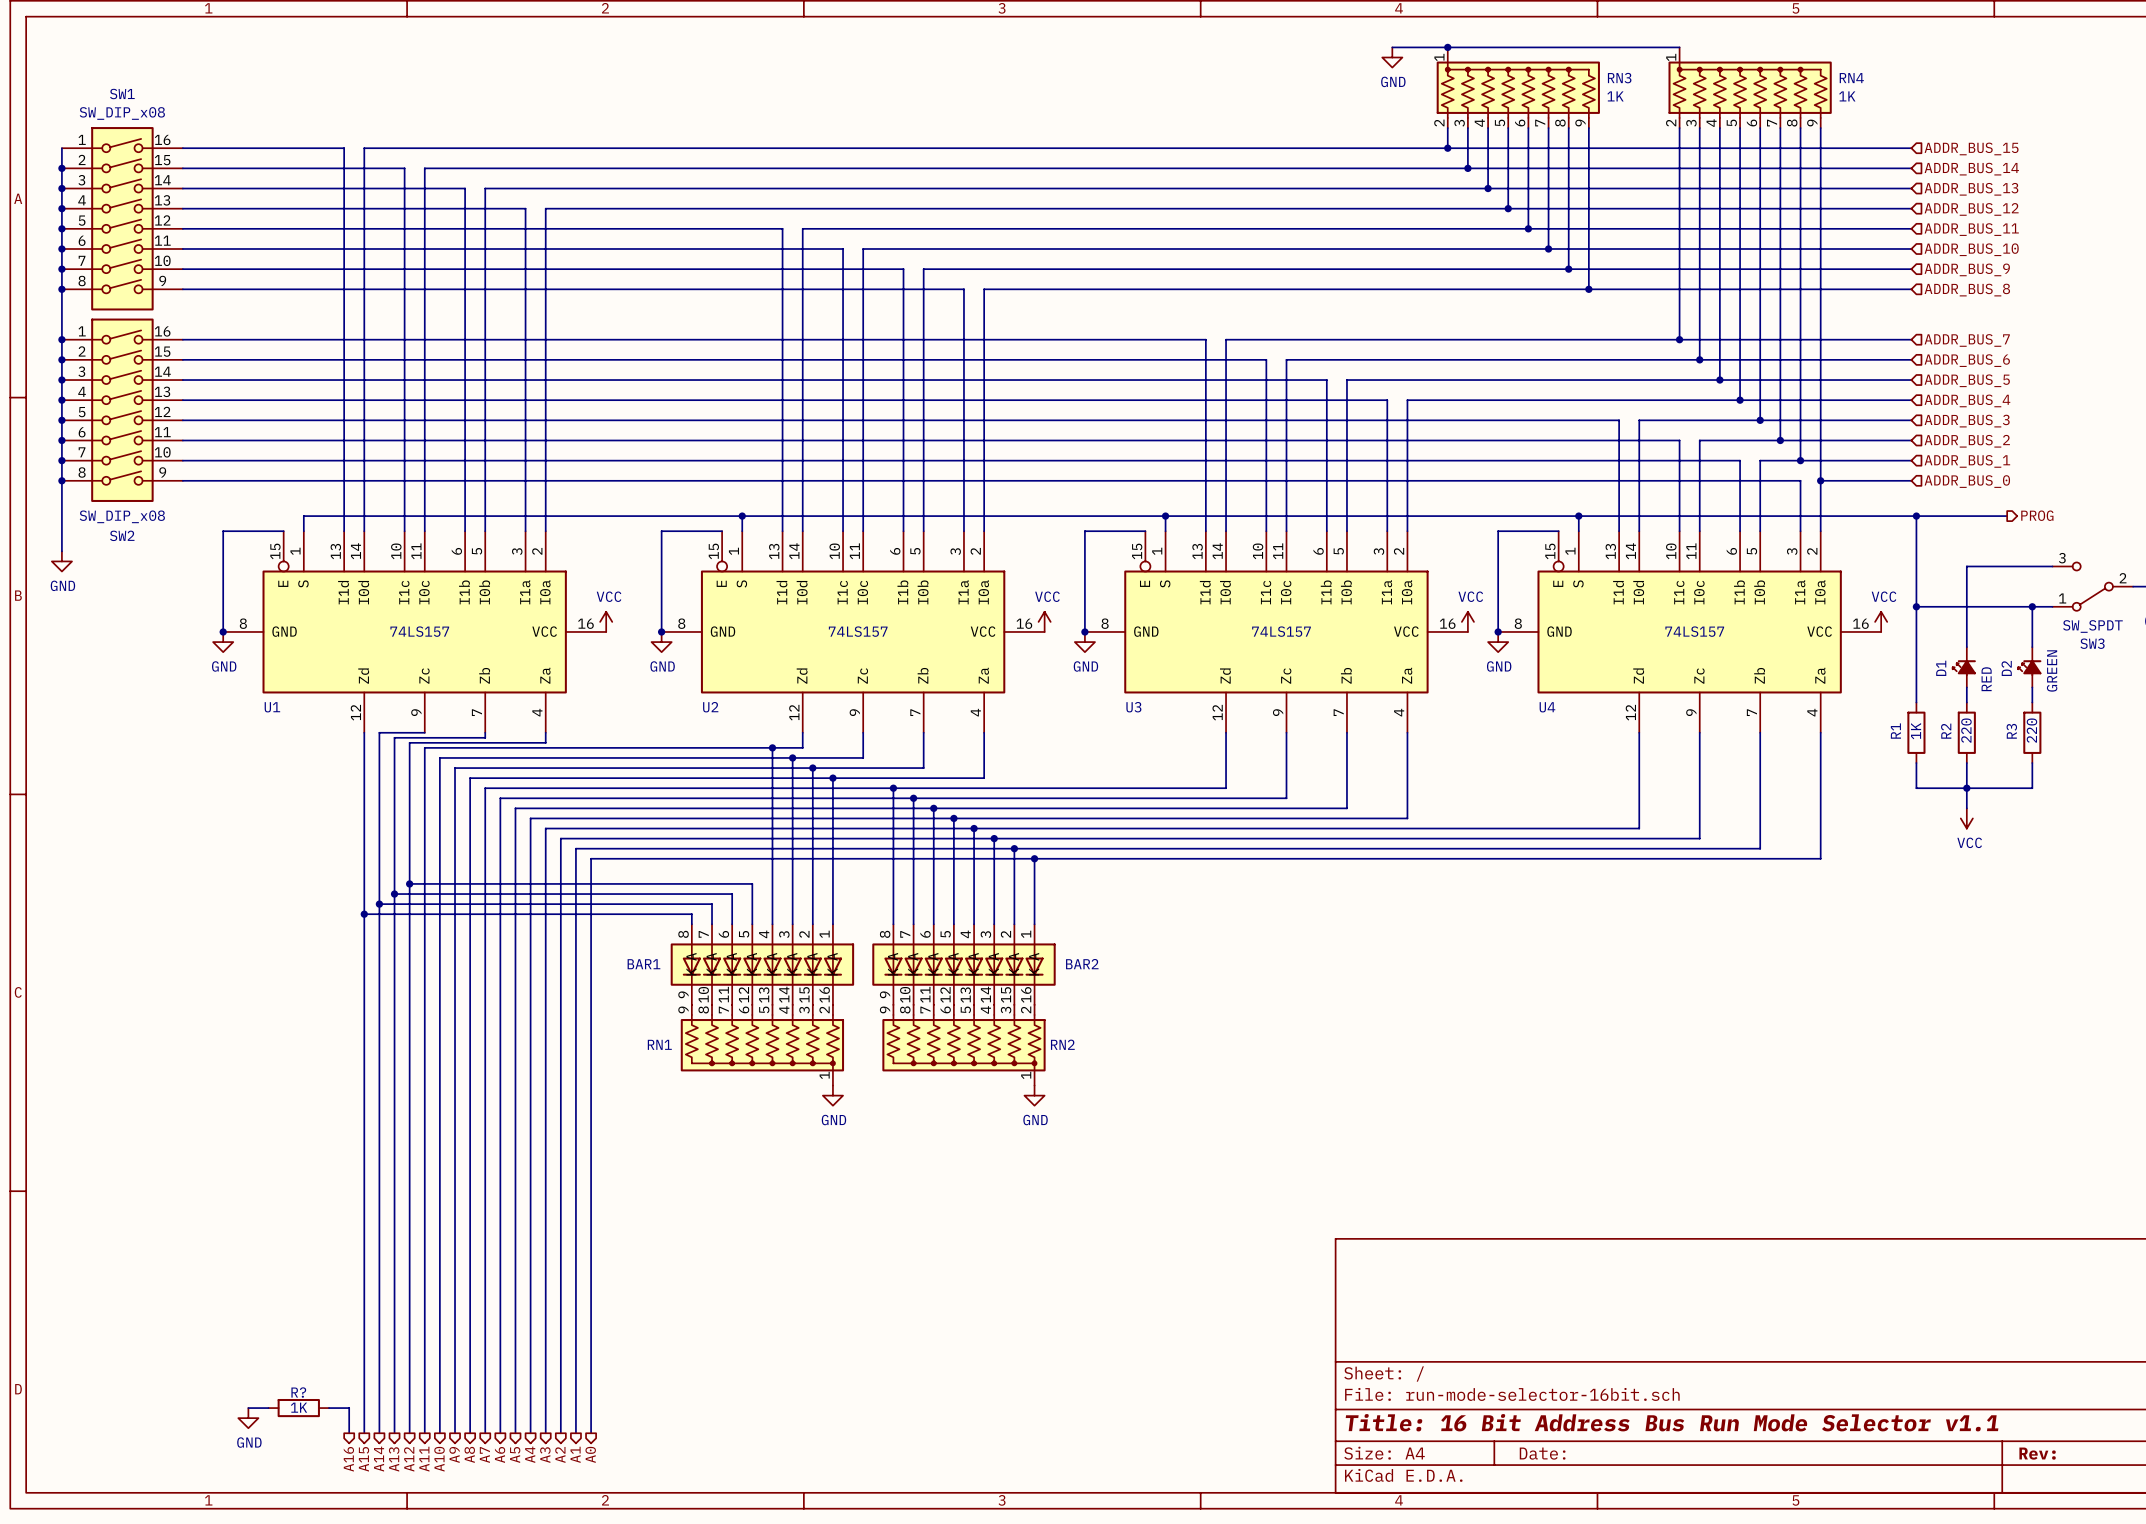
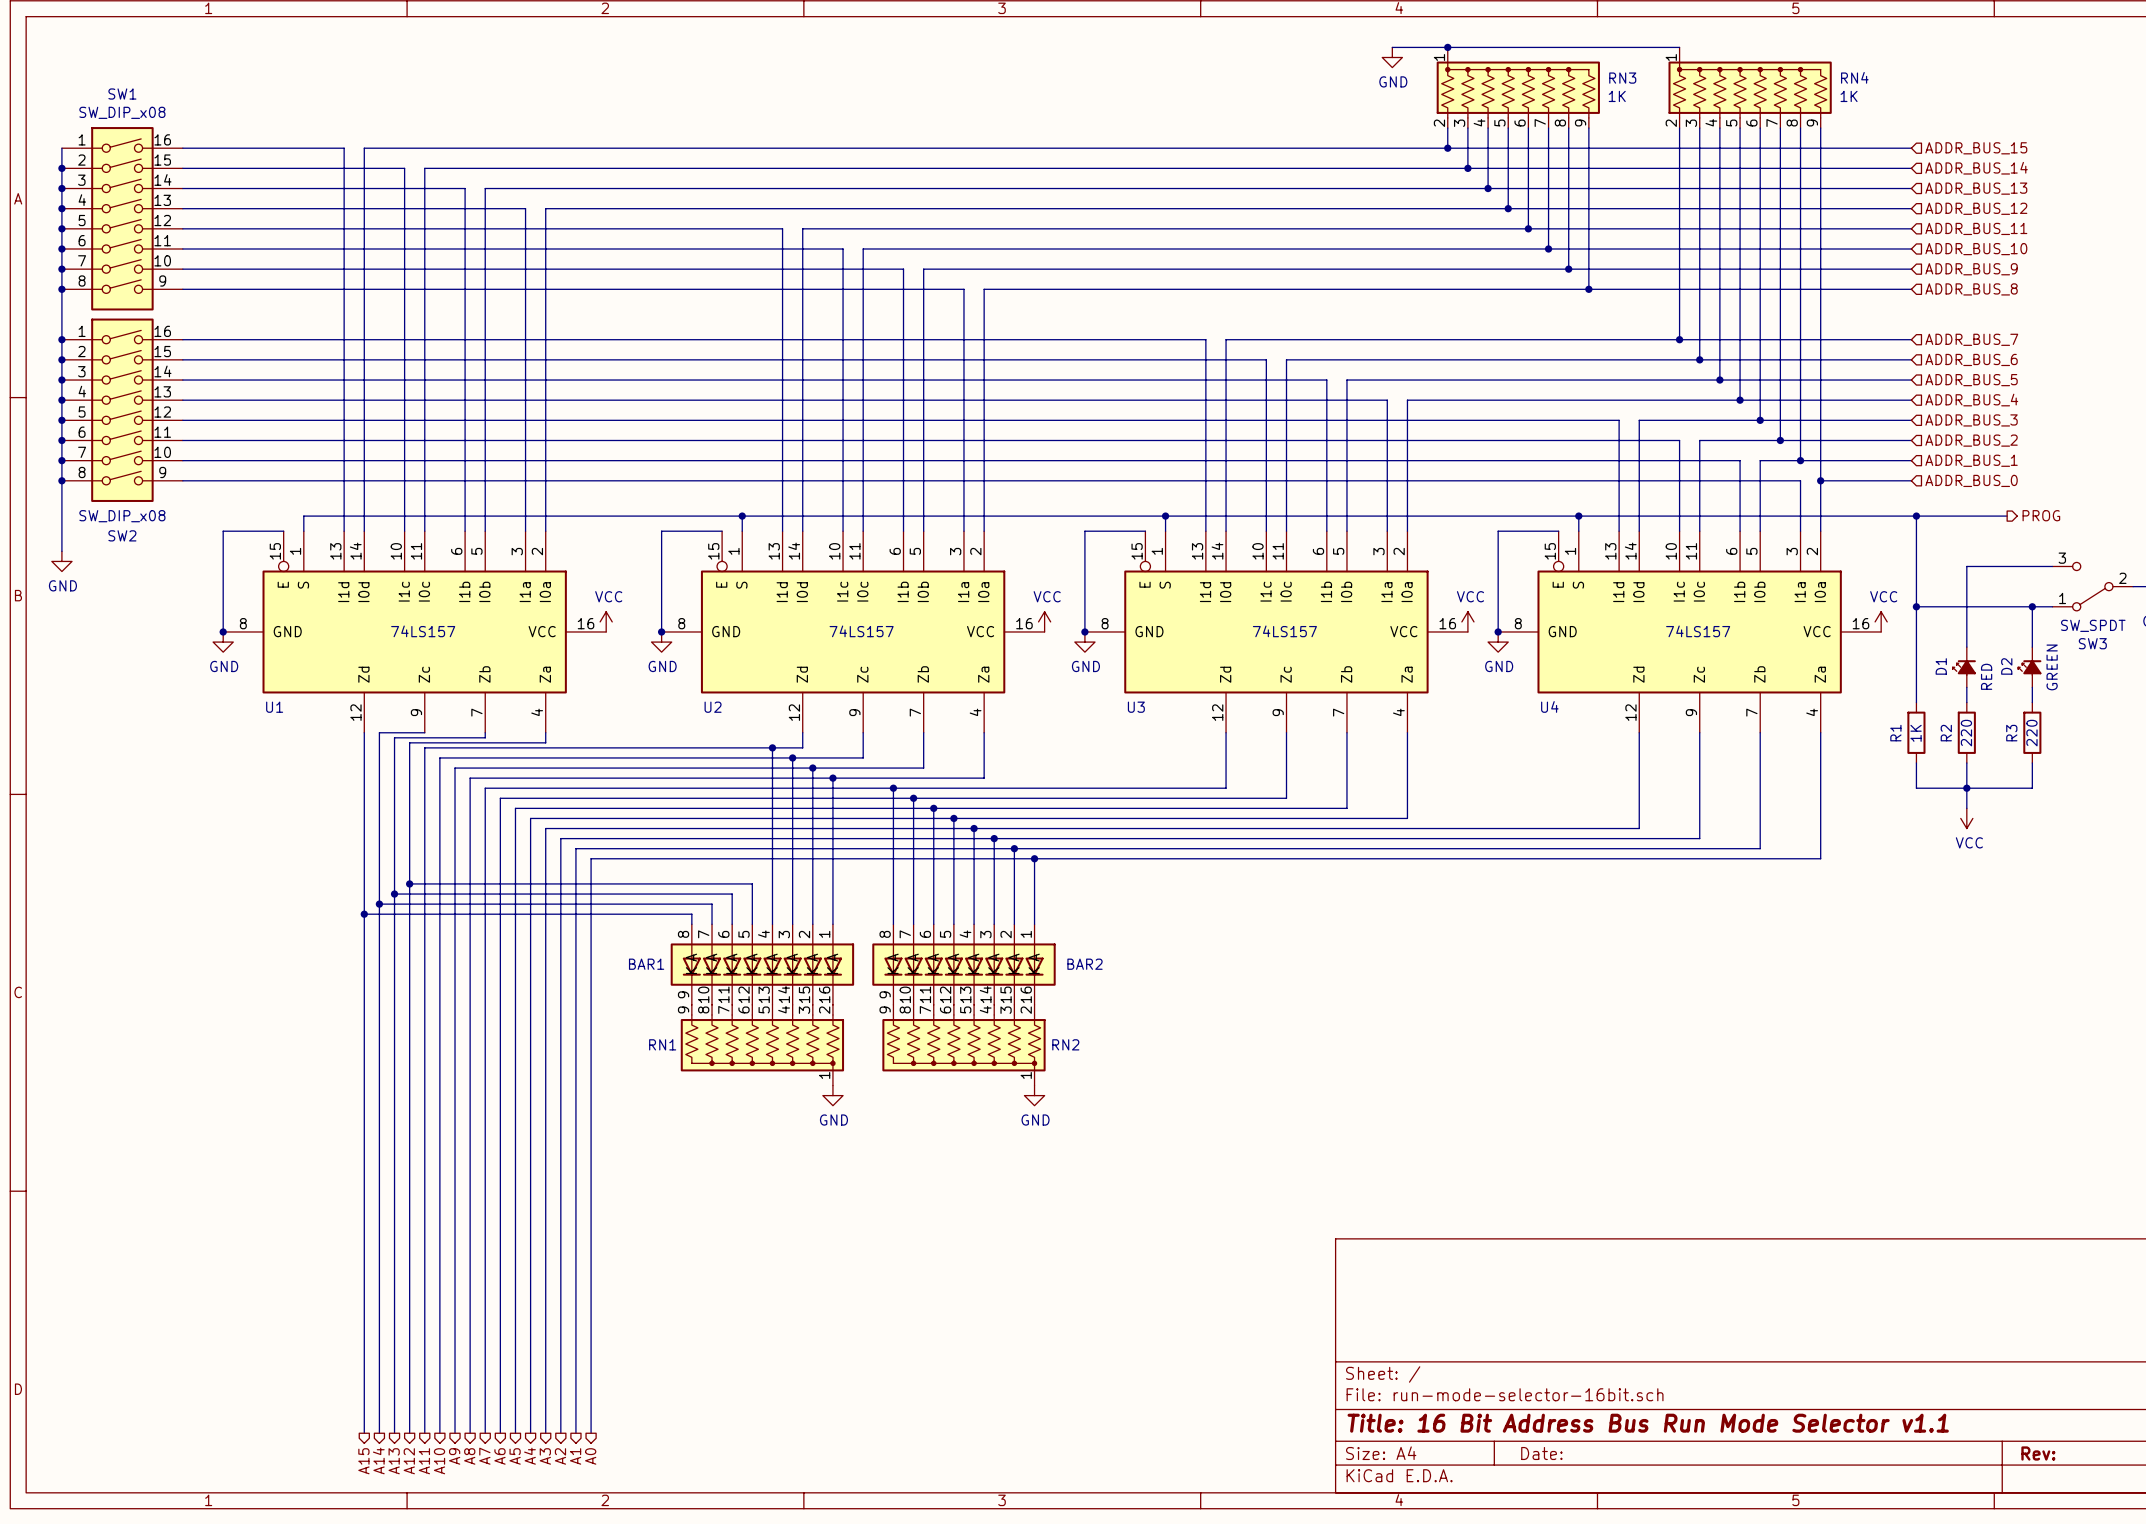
wire: (248, 1408) (268, 1408) -> none
R?: 1K (298, 1408) -> none
wire: (329, 1408) (349, 1408) (349, 1433) -> none
power symbol: GND (248, 1418) -> none
hierarchical label: A16 (348, 1459) -> none

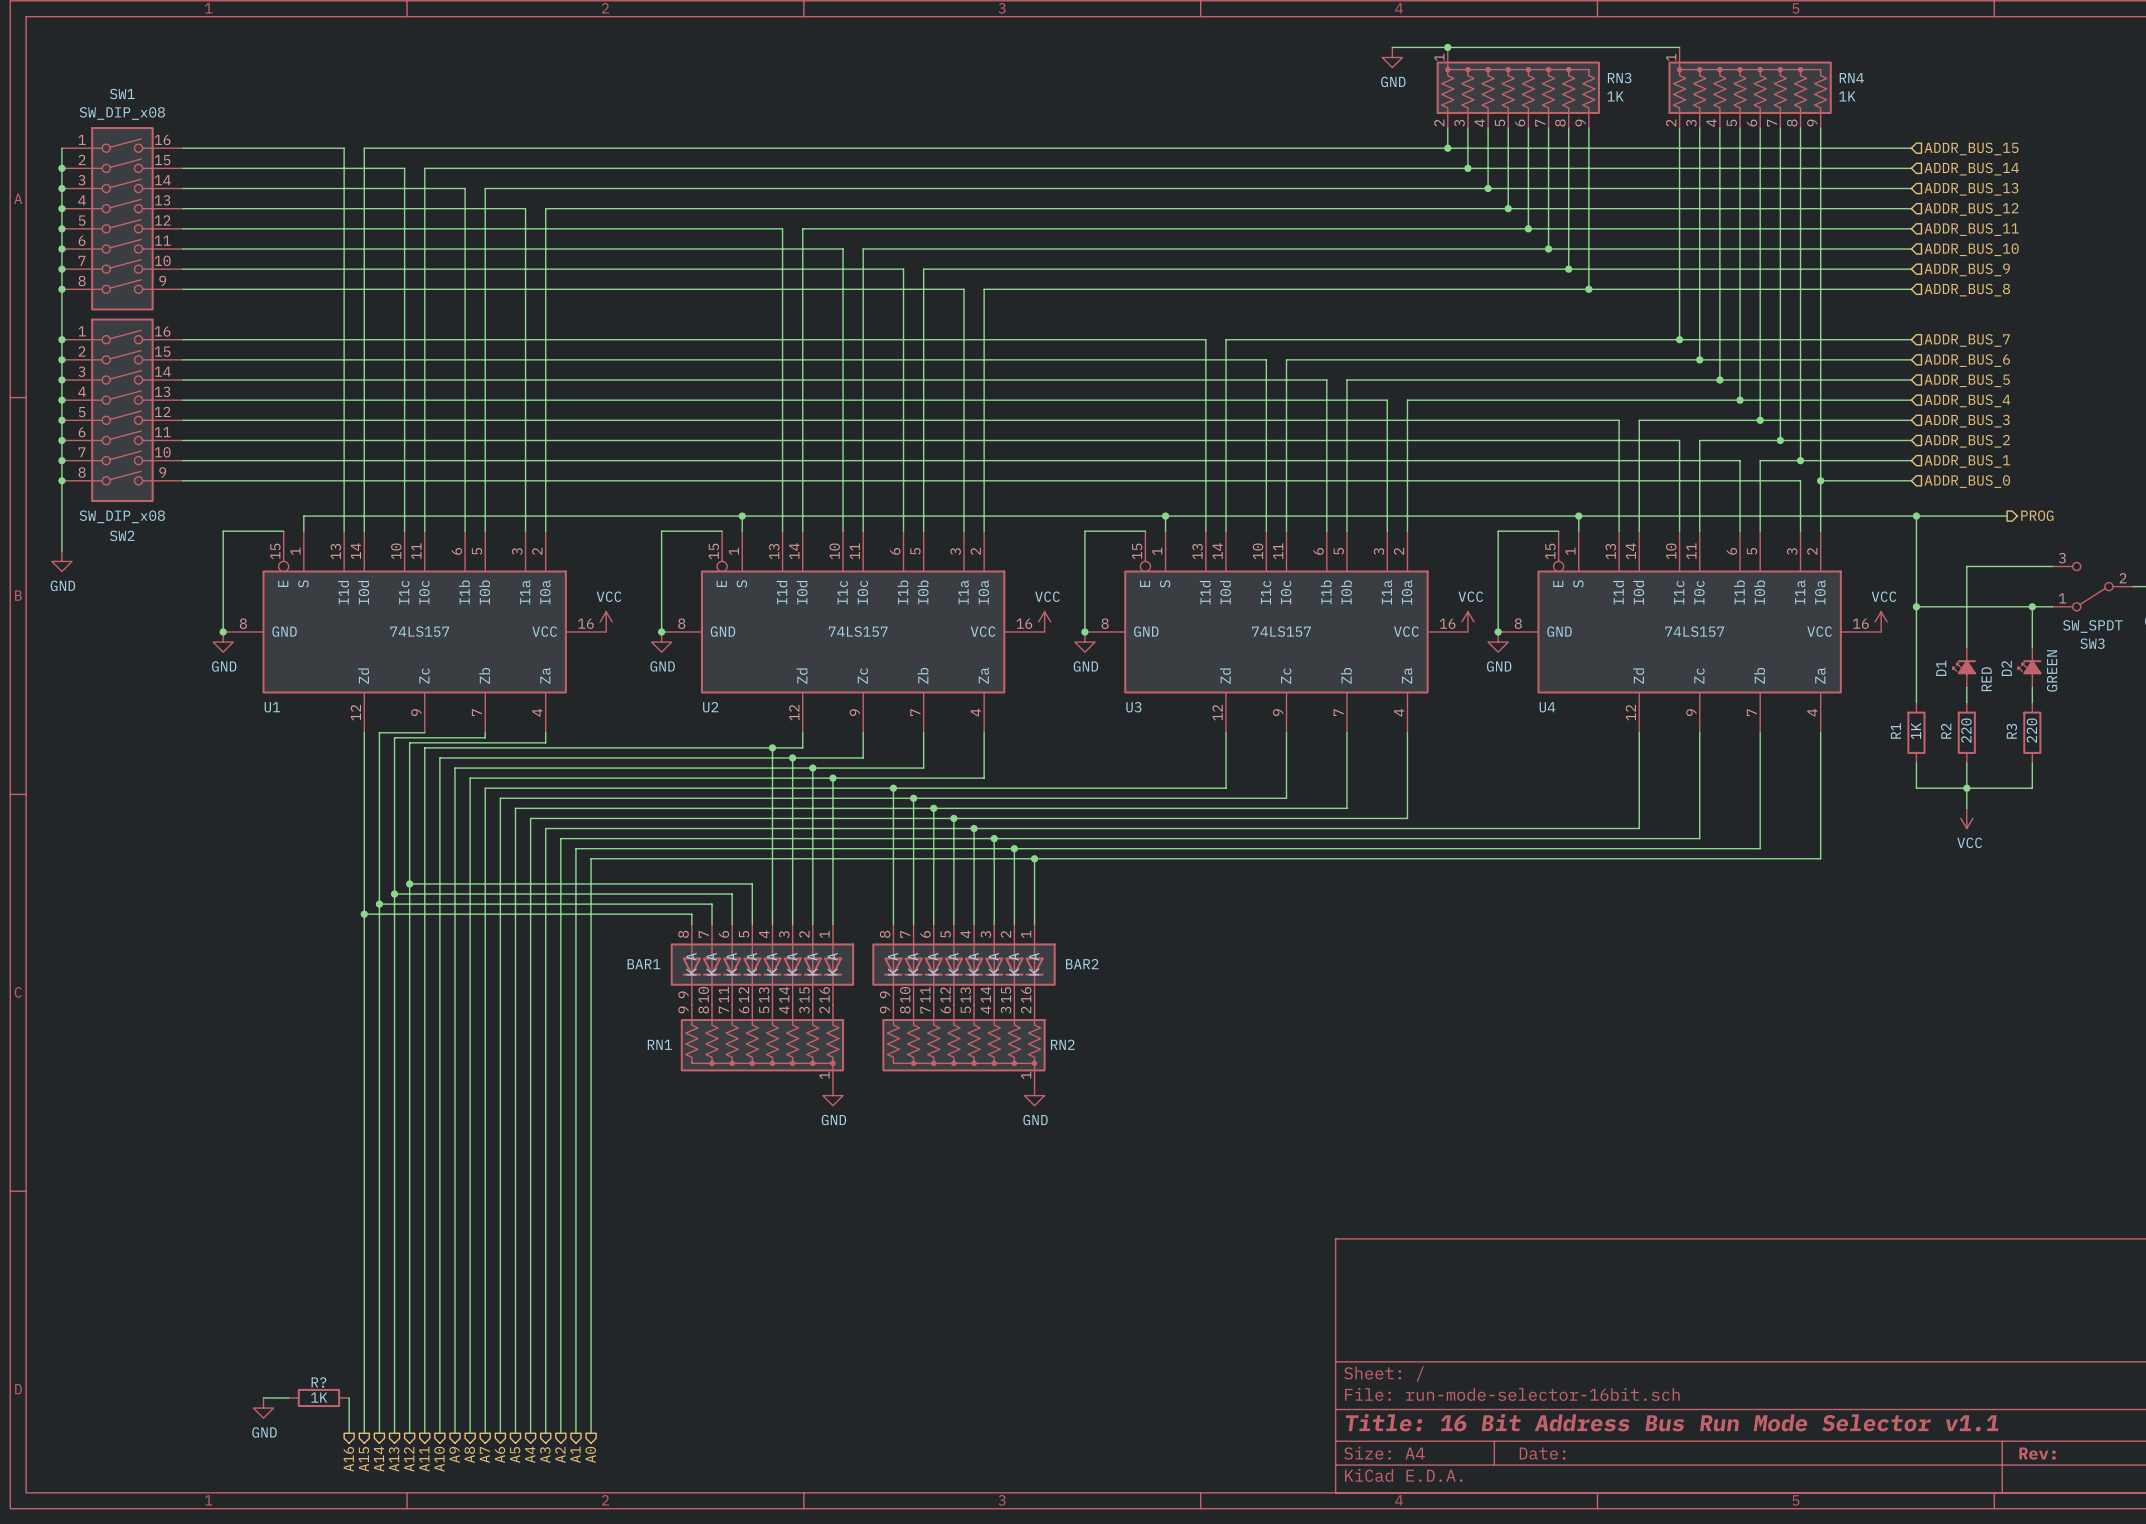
wire: none -> (263, 1397) (288, 1397)
R?: none -> 1K (318, 1397)
wire: none -> (349, 1397) (349, 1433)
power symbol: none -> GND (263, 1408)
hierarchical label: none -> A16 (348, 1459)

